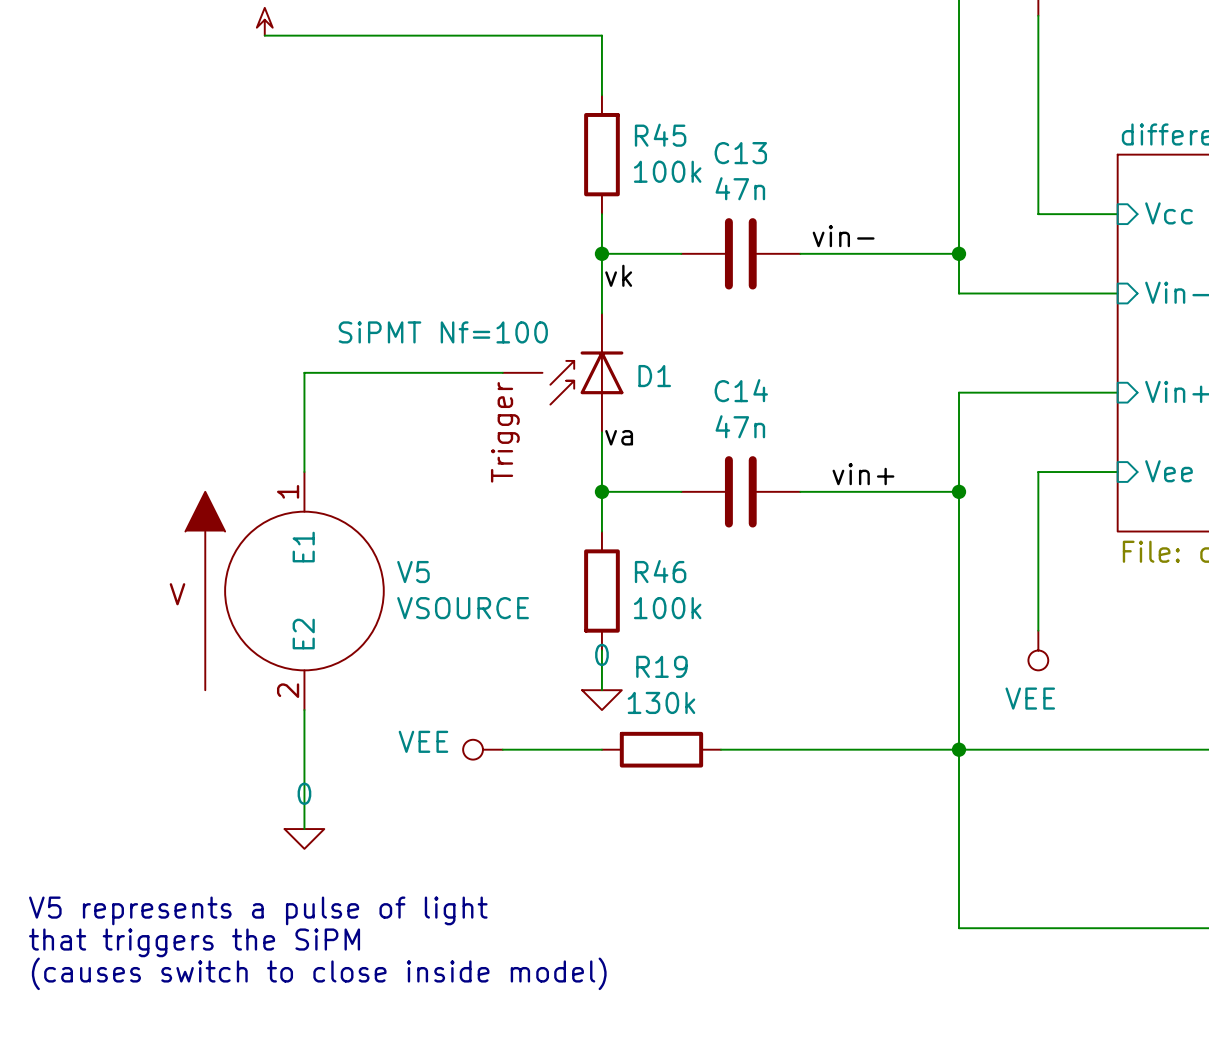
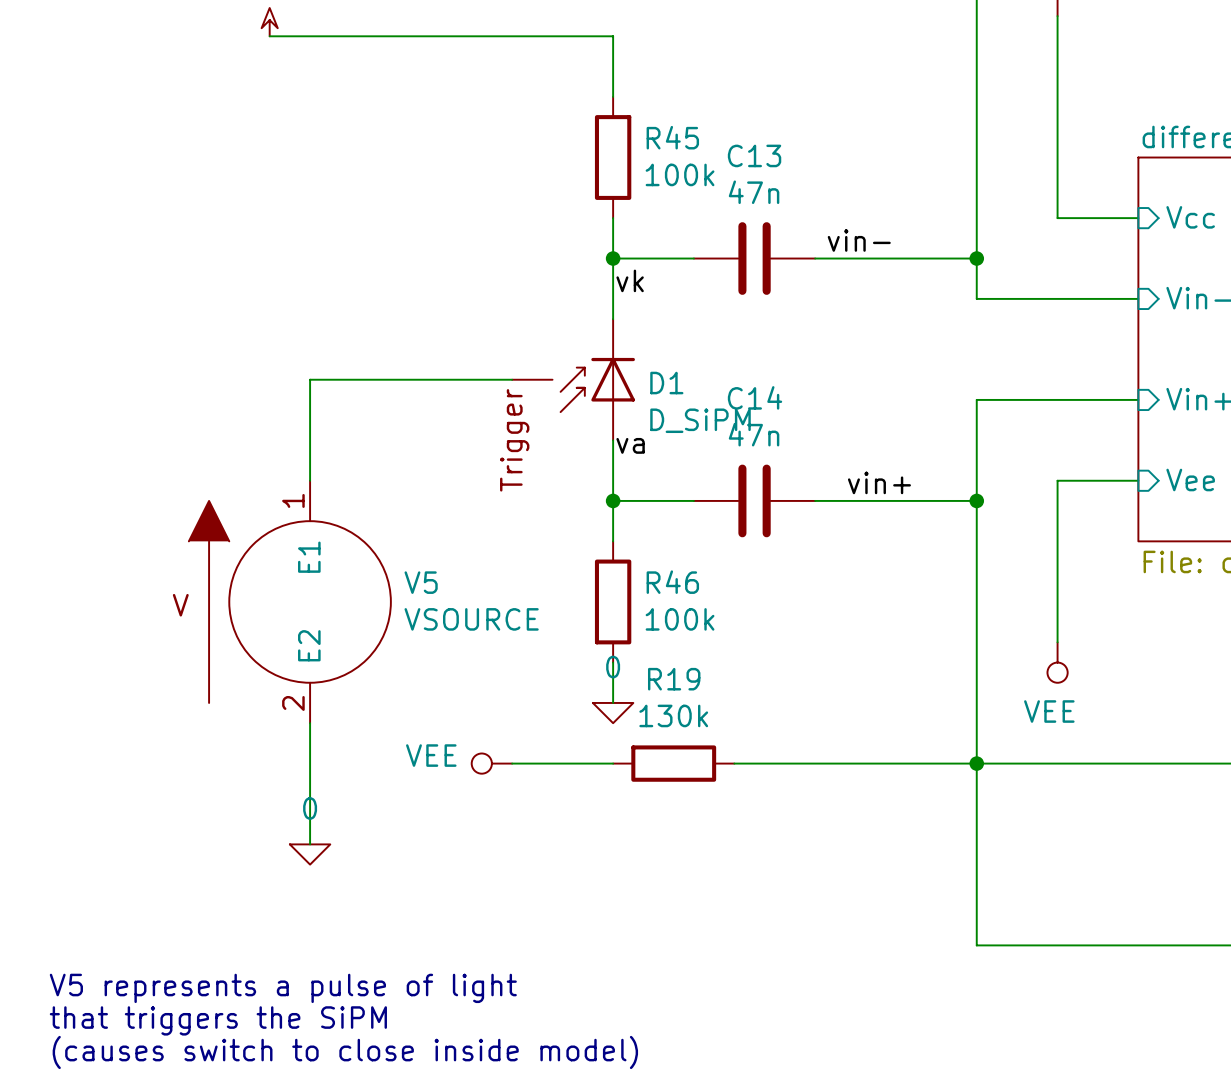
D1 text: SiPMT Nf=100 (443, 332) -> none
D1 value: none -> D_SiPM (700, 420)
text position: V5 represents a pulse of light (258, 910) -> V5 represents a pulse of light (283, 988)
text position: that triggers the SiPM (194, 942) -> that triggers the SiPM (218, 1020)
text position: (causes switch to close inside model) (319, 973) -> (causes switch to close inside model) (345, 1052)

